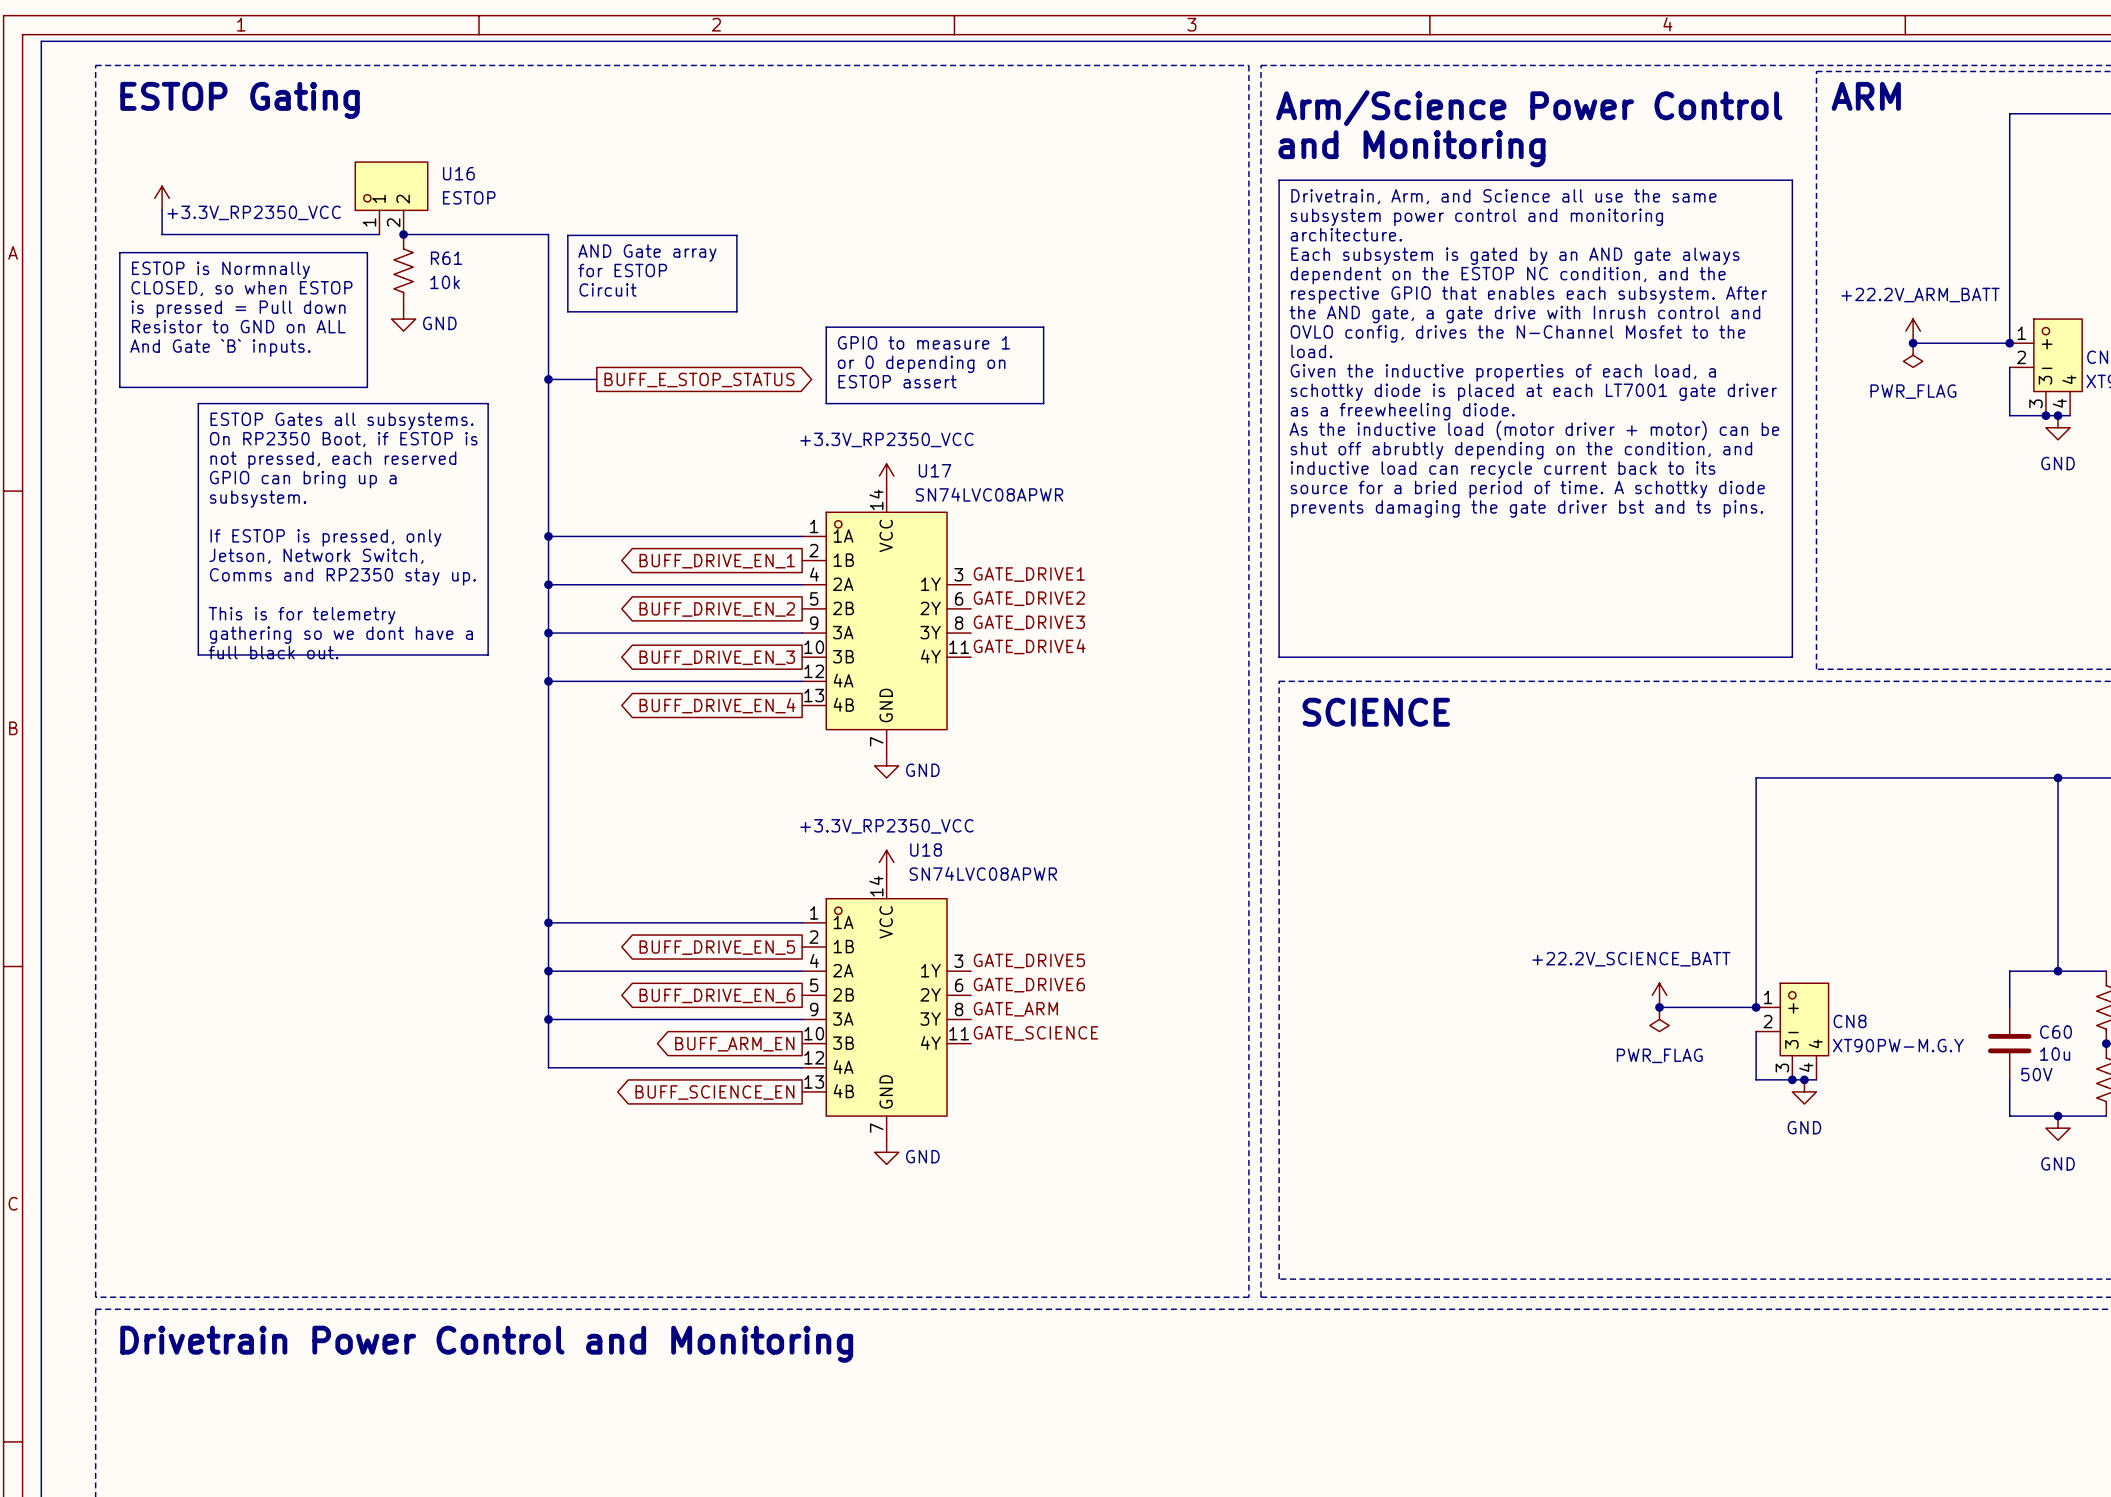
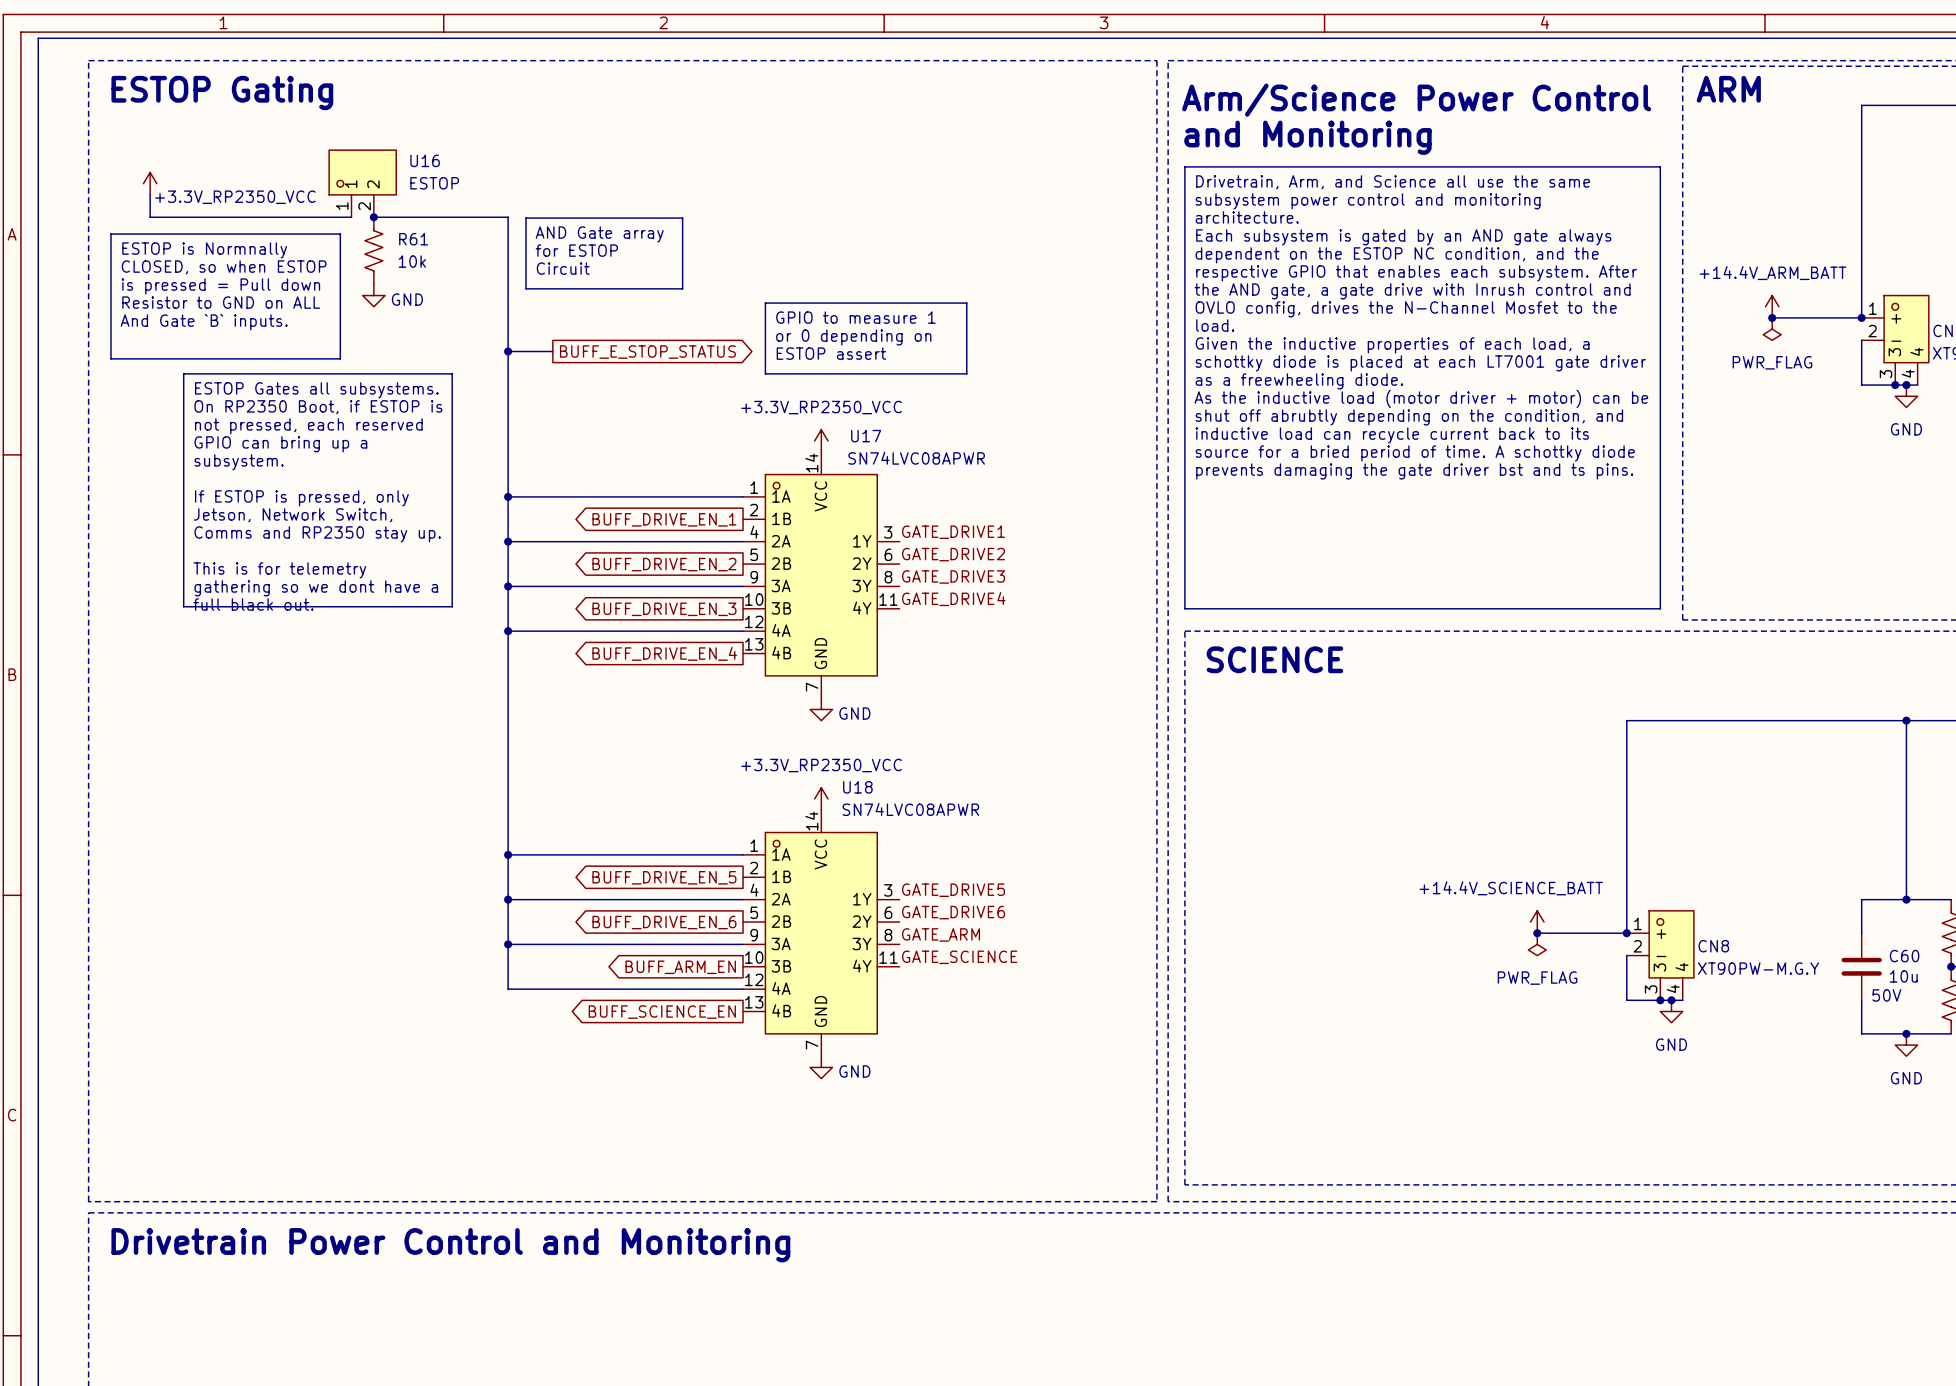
power symbol: +22.2V_ARM_BATT (1913, 331) -> +14.4V_ARM_BATT (1772, 306)
power symbol: +22.2V_SCIENCE_BATT (1659, 995) -> +14.4V_SCIENCE_BATT (1537, 922)

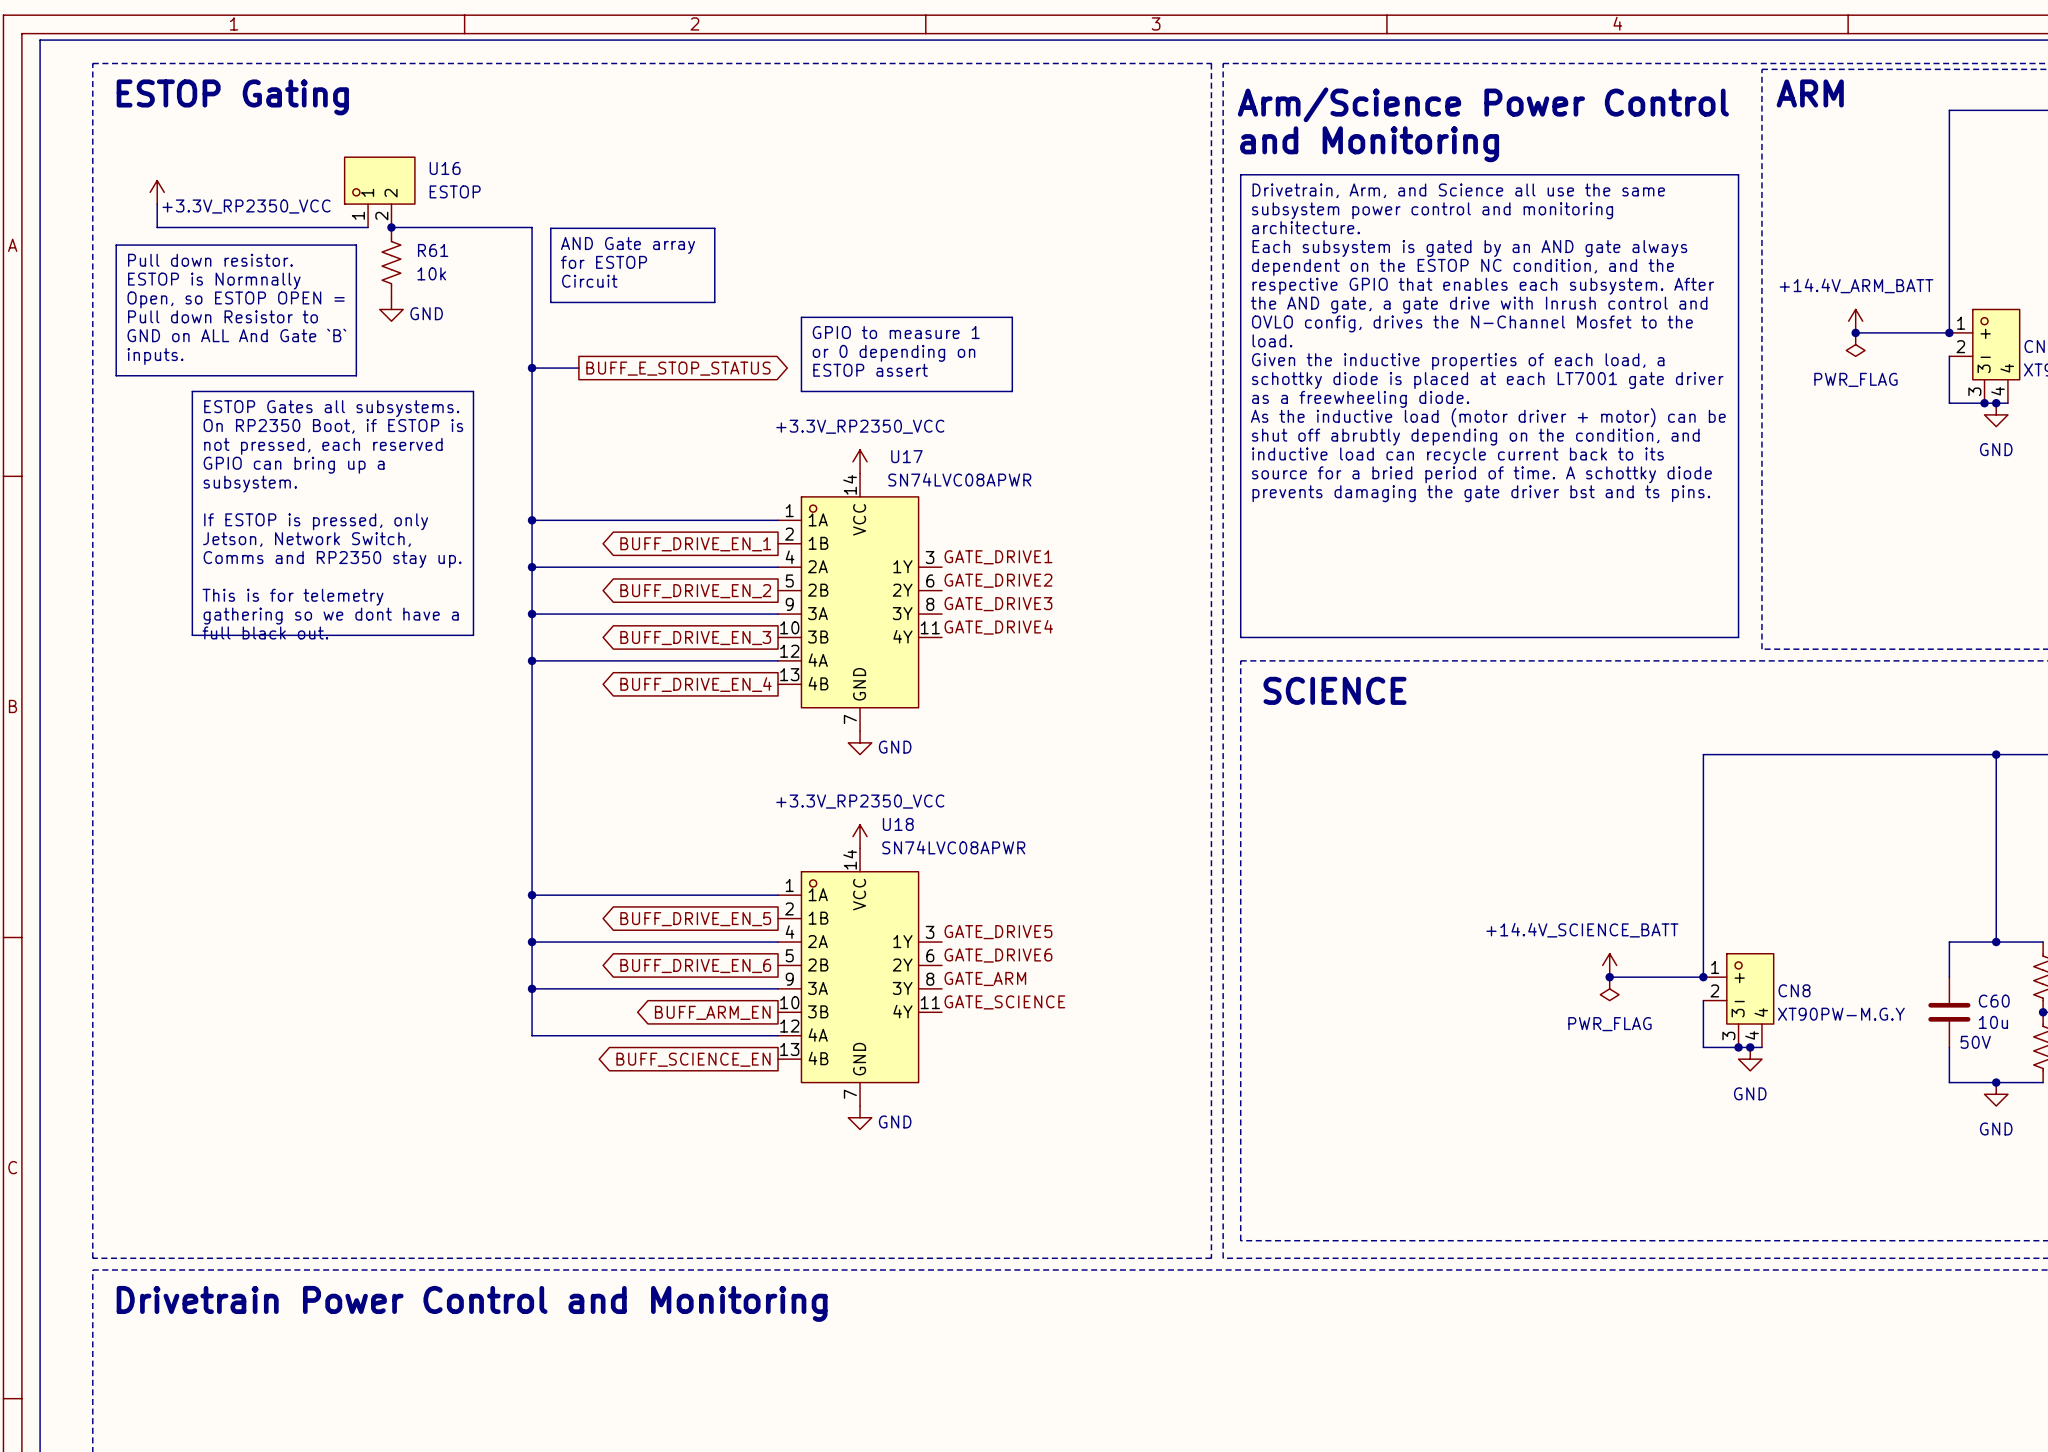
text: ESTOP is Normnally (204, 250) -> Pull down resistor. (210, 260)
text: CLOSED, so when ESTOP (224, 267) -> ESTOP is Normnally (214, 281)
text: is pressed = Pull down (220, 286) -> Open, so ESTOP OPEN = (236, 299)
text: Resistor to GND on ALL (221, 302) -> Pull down Resistor to (222, 316)
text: And Gate `B` inputs. (204, 322) -> GND on ALL And Gate `B` (236, 335)
text: none -> inputs. (155, 356)

